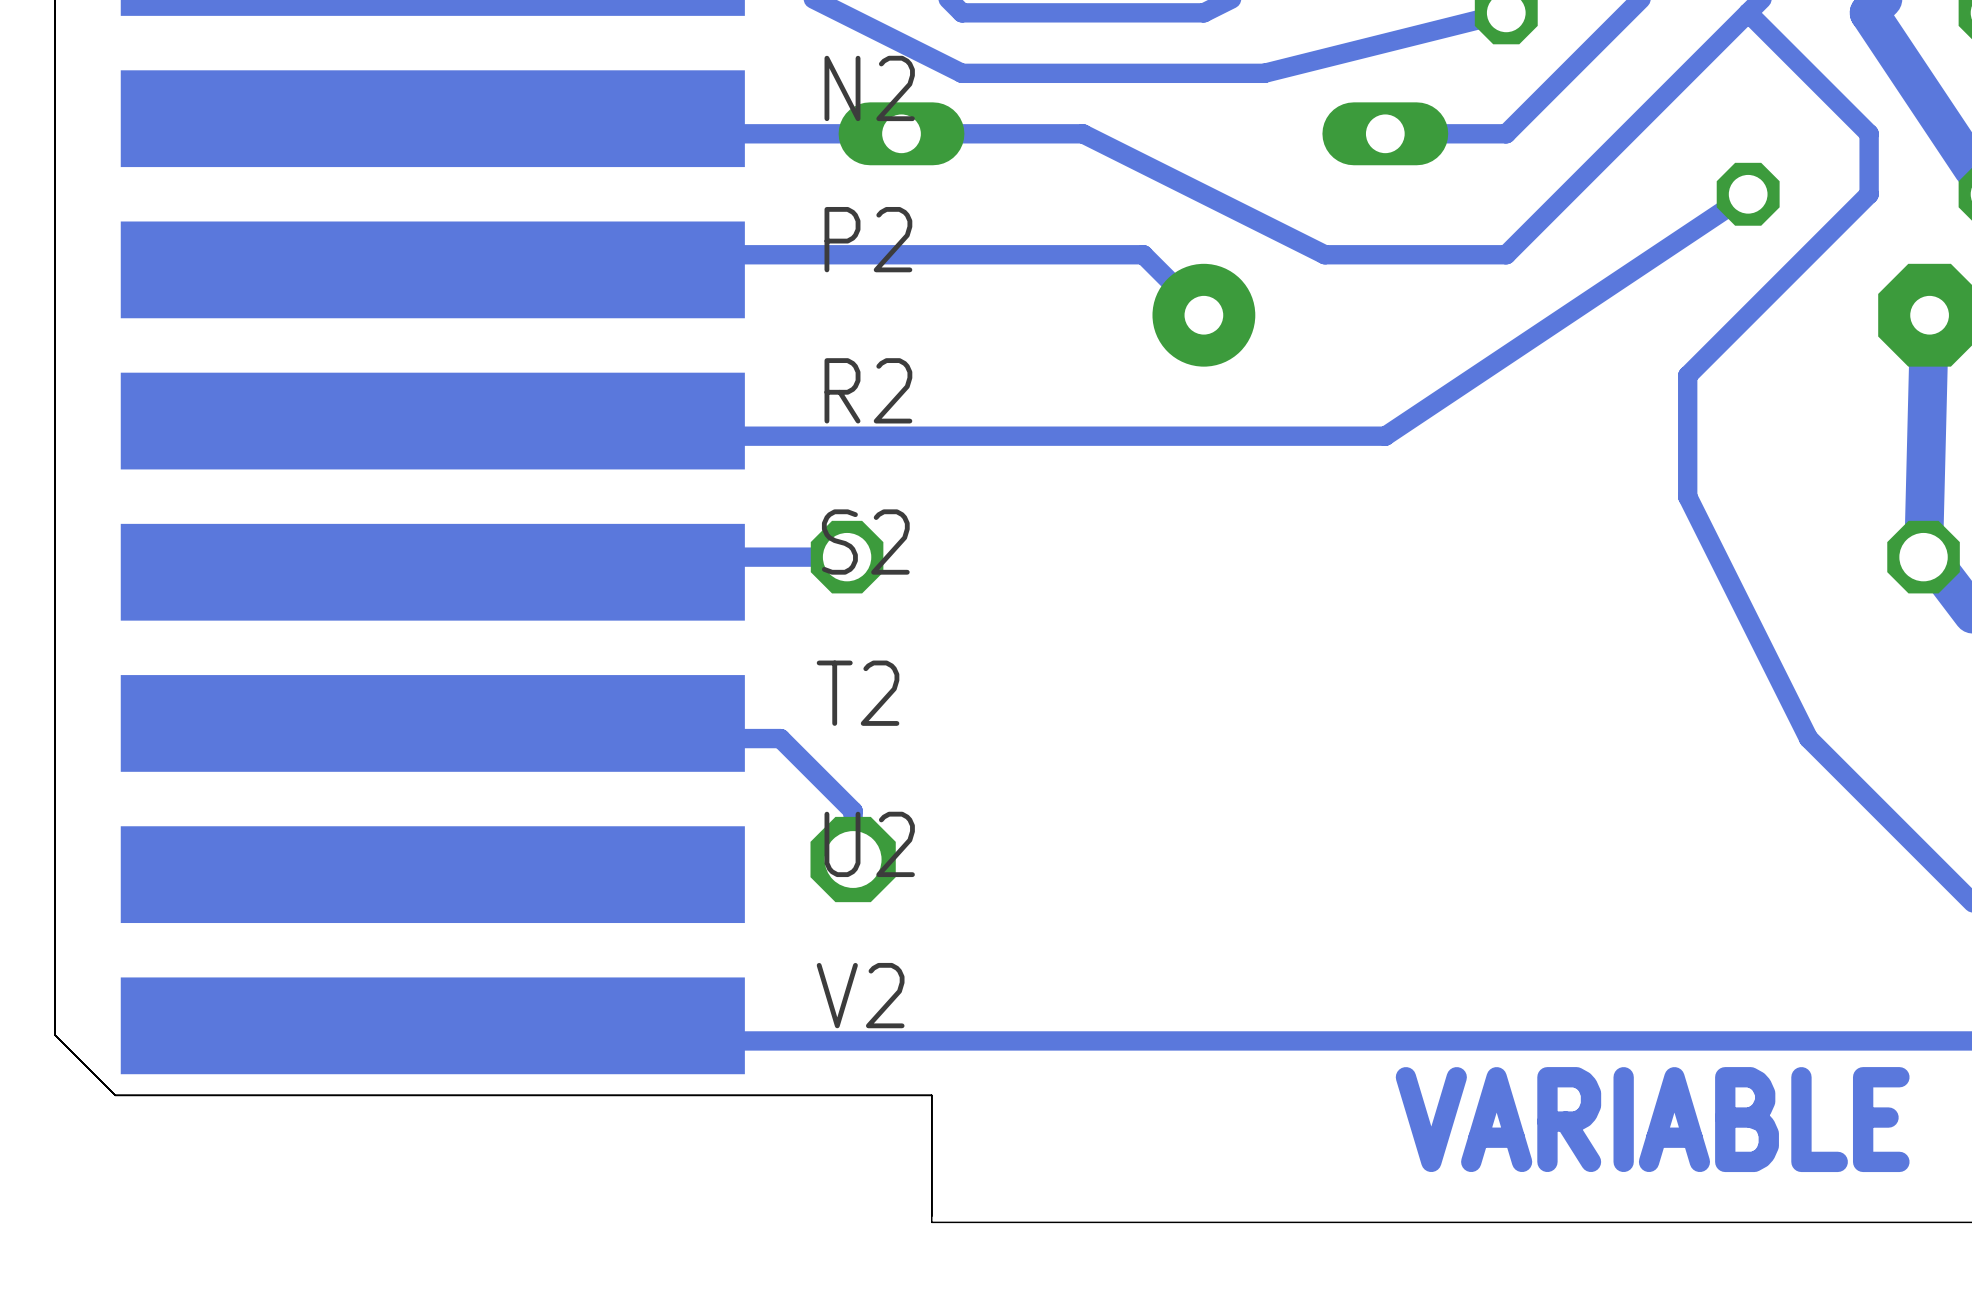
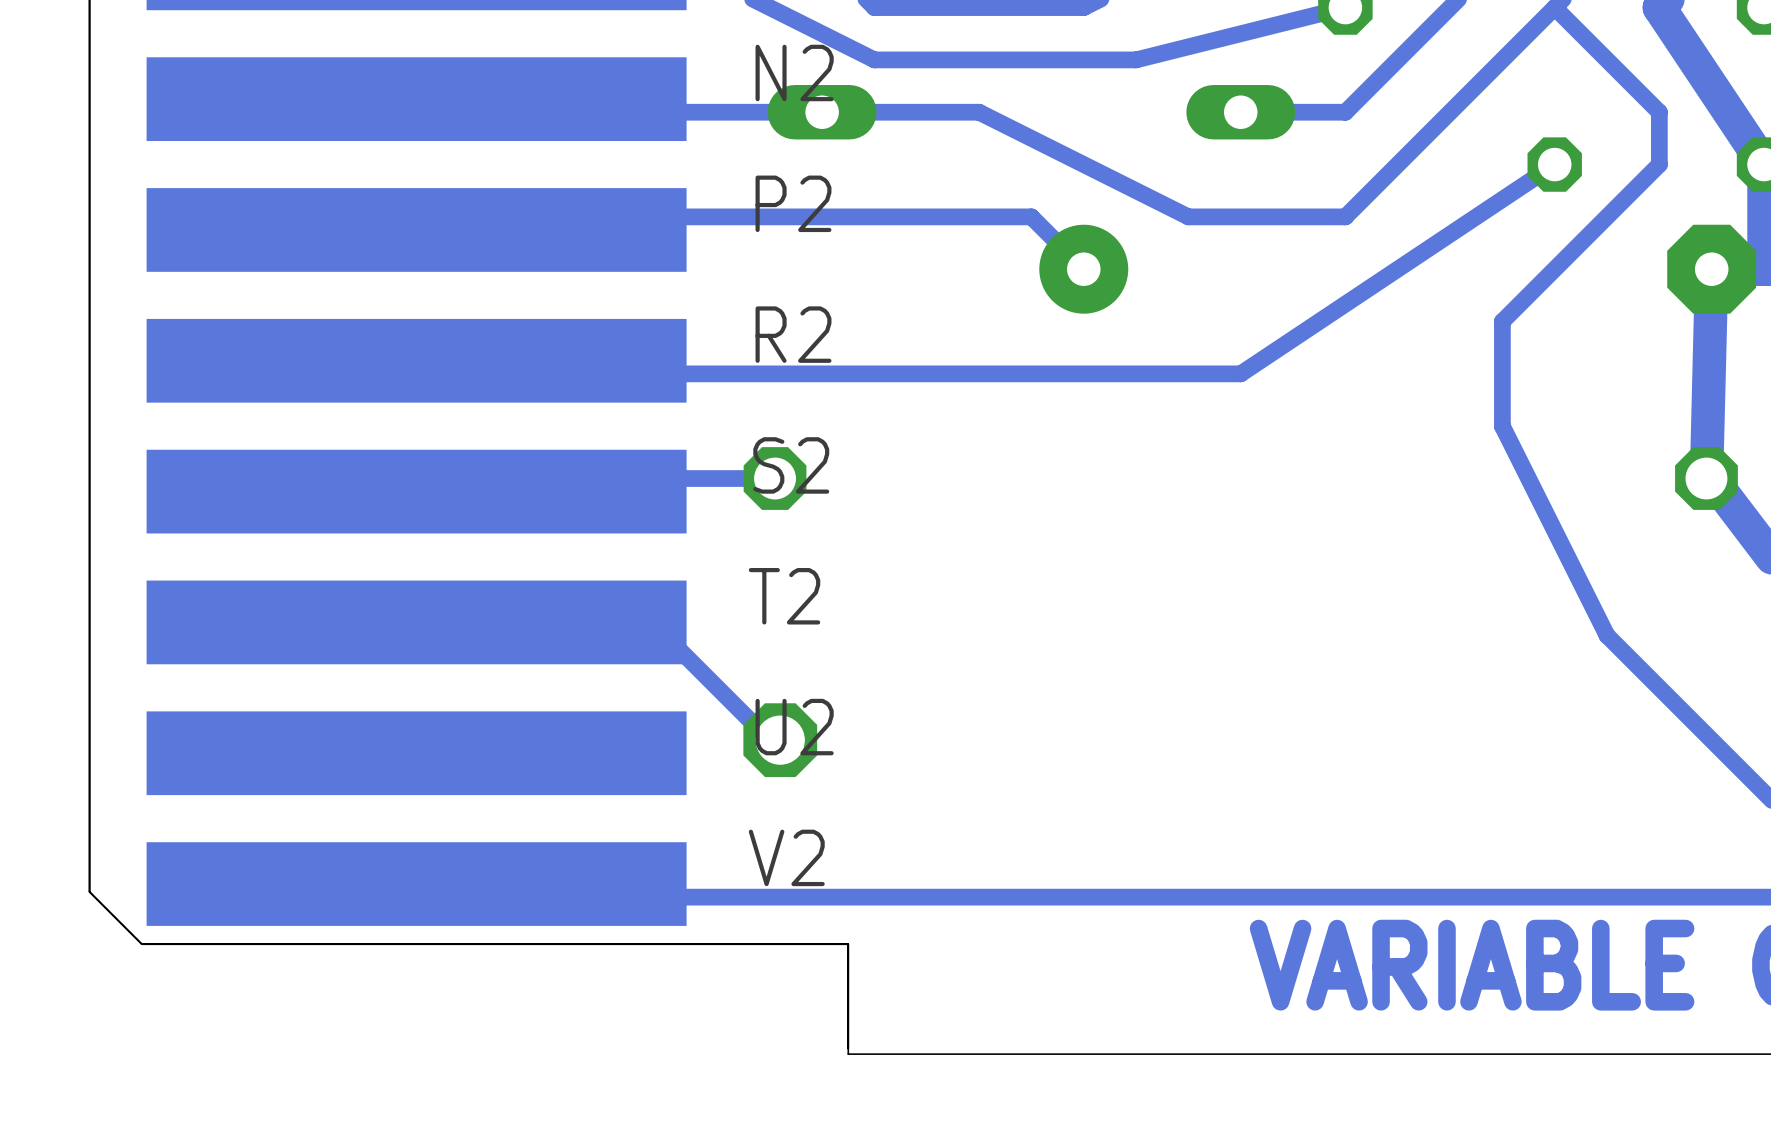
bottom track: (720, 738) (780, 738) (853, 811) (853, 859) -> (665, 635) (769, 740) (780, 740)

